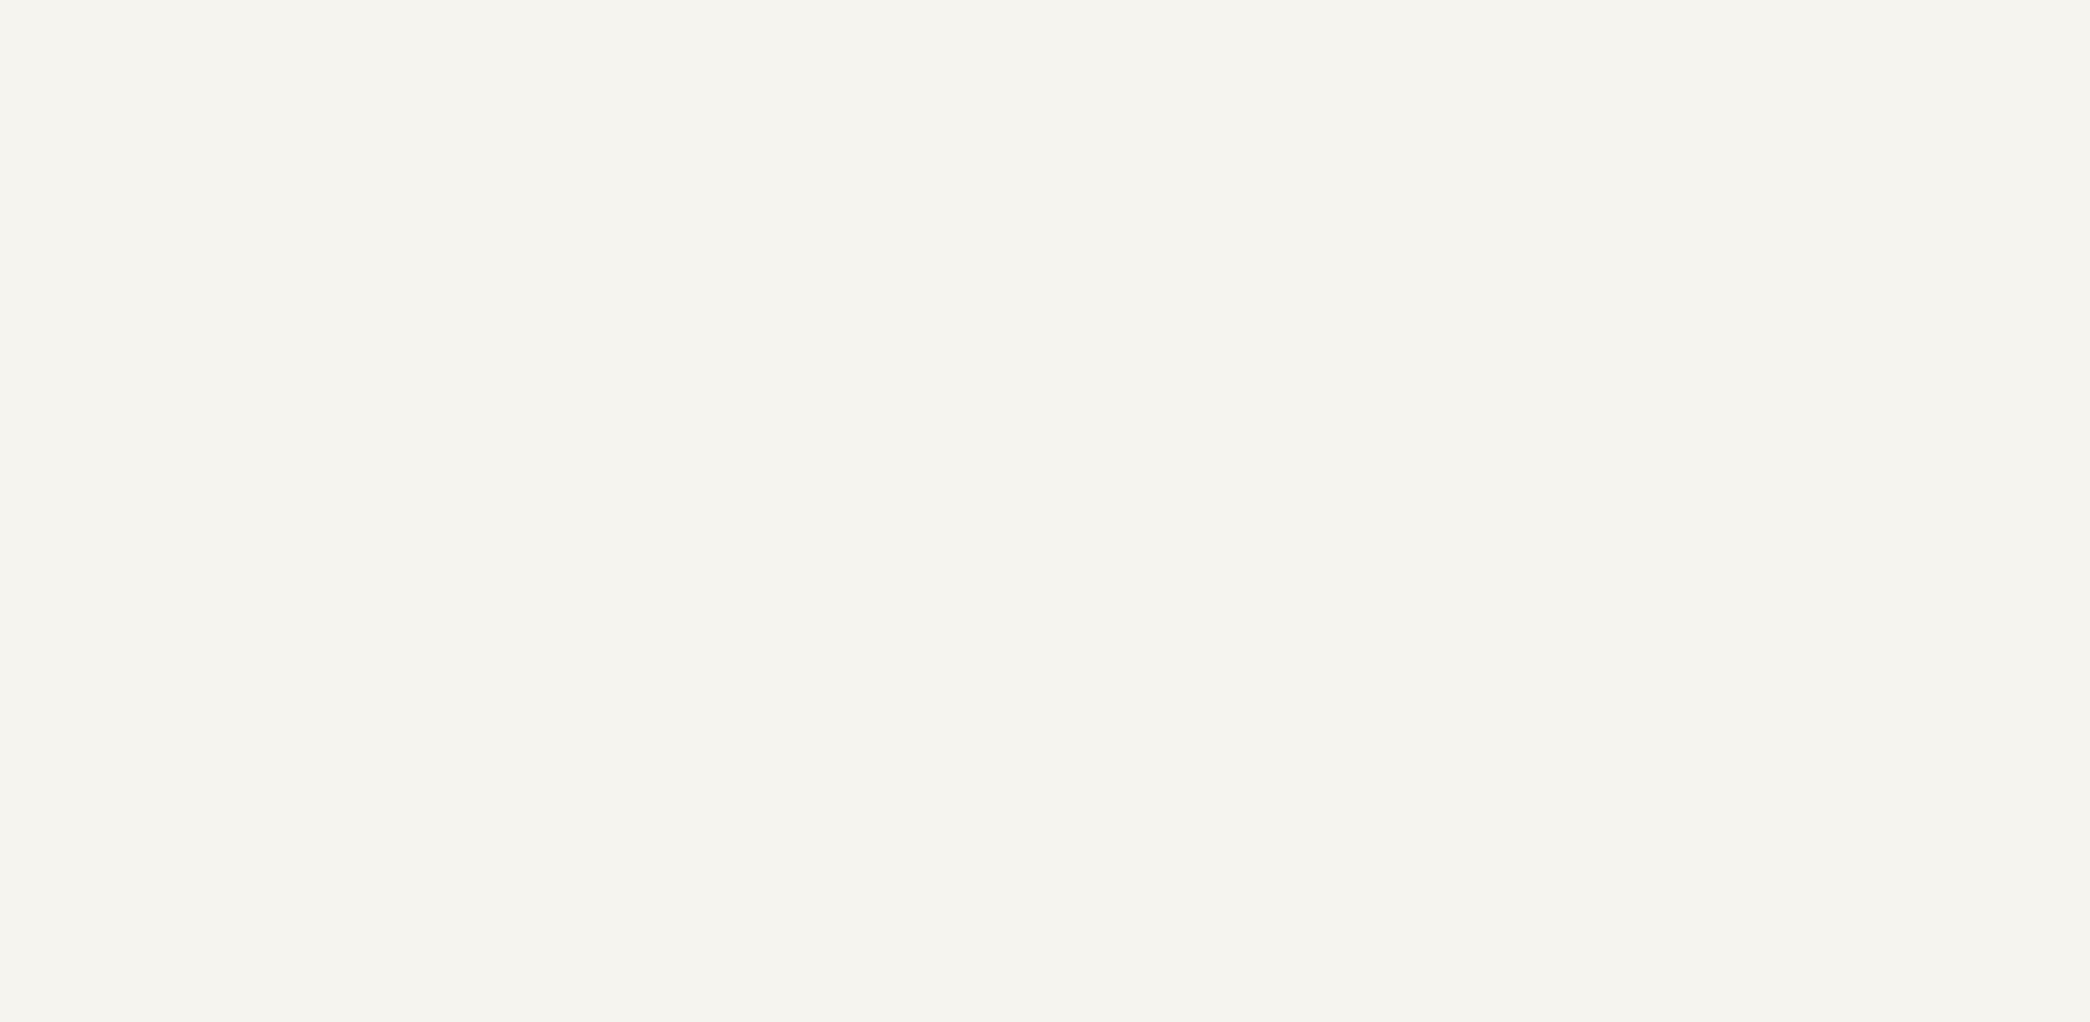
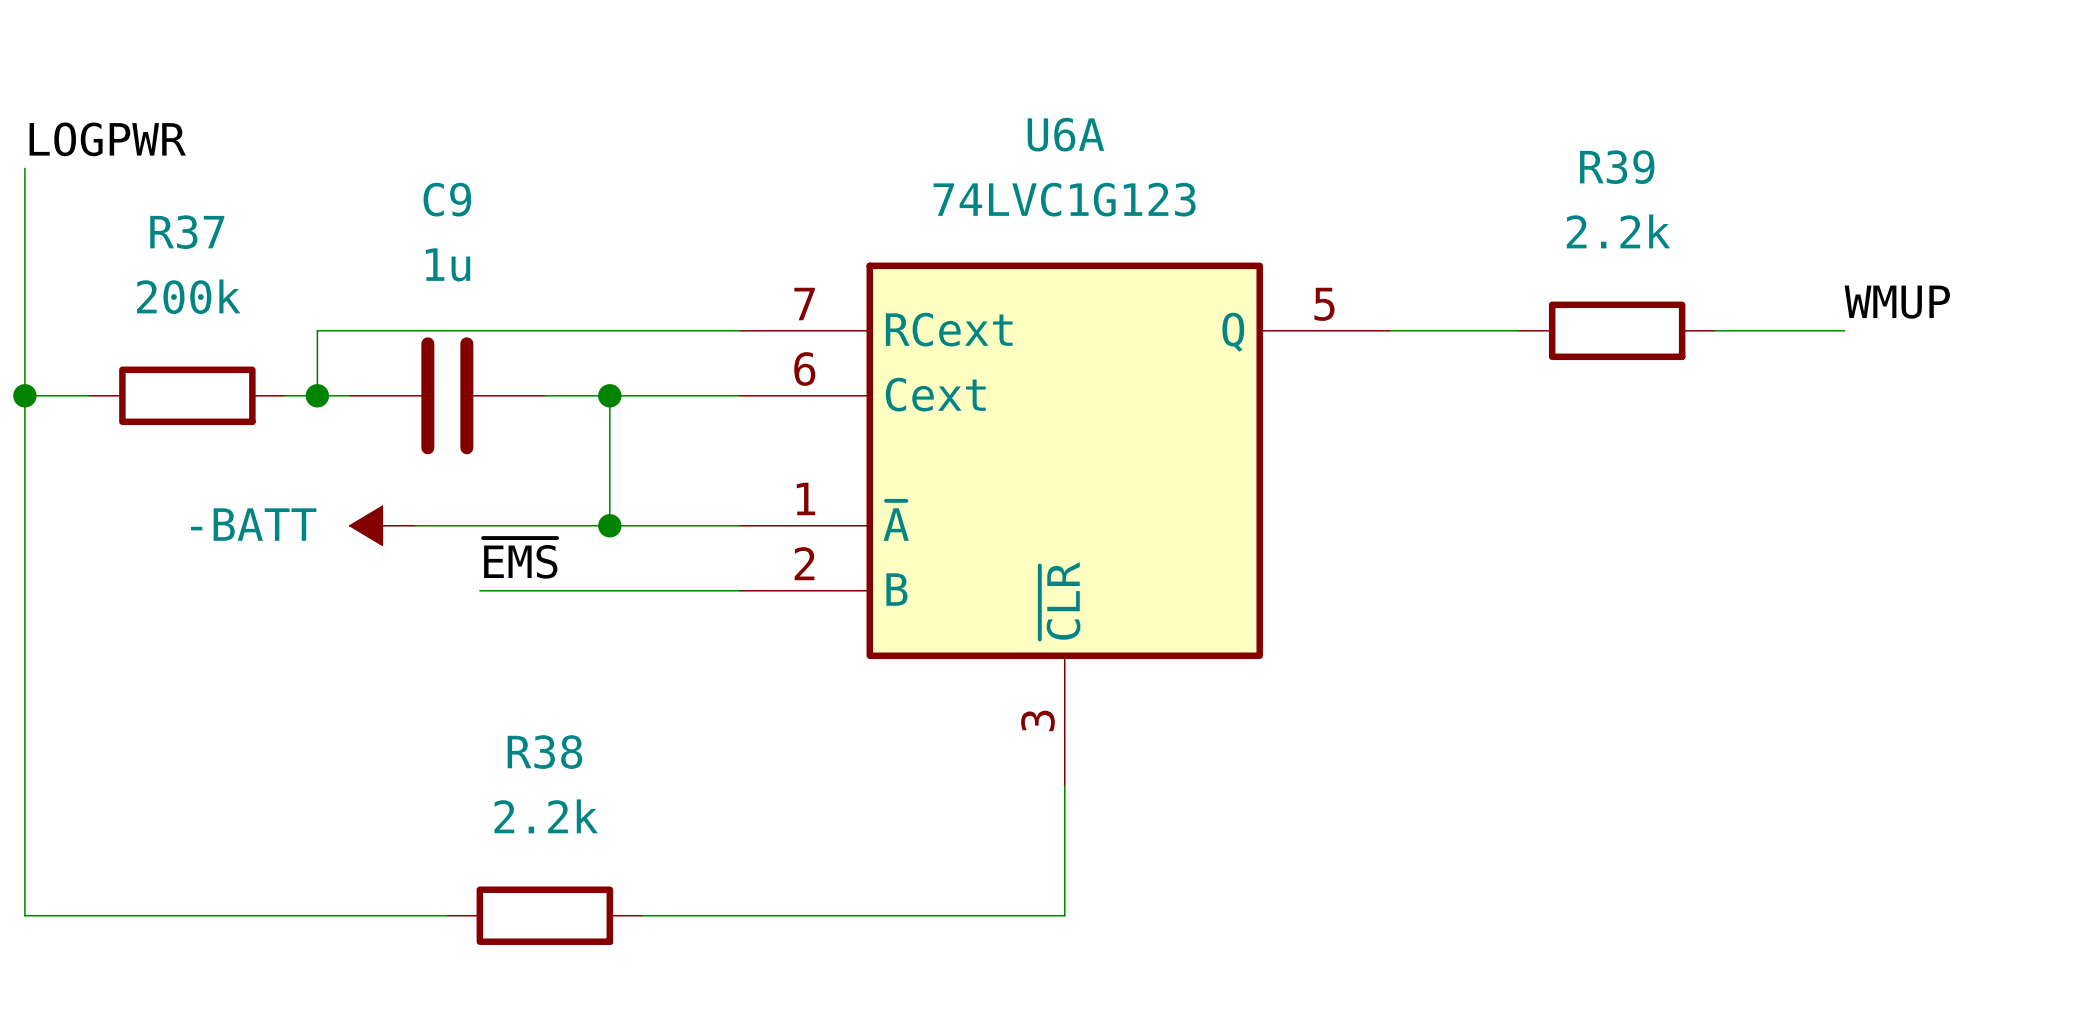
label: none -> LOGPWR (107, 139)
wire: none -> (24, 168) (24, 915) (447, 915)
label: none -> WMUP (1897, 302)
wire: none -> (739, 330) (317, 330) (317, 395)
wire: none -> (1389, 330) (1519, 330)
R39: none -> 2.2k (1617, 330)
wire: none -> (1714, 330) (1844, 330)
wire: none -> (24, 395) (89, 395)
junction: none -> (24, 395)
R37: none -> 200k (187, 395)
wire: none -> (284, 395) (349, 395)
junction: none -> (317, 395)
C9: none -> 1u (447, 395)
wire: none -> (544, 395) (739, 395)
wire: none -> (609, 395) (609, 525)
junction: none -> (609, 395)
U6A: none -> 74LVC1G123 (1064, 524)
power symbol: none -> -BATT (382, 525)
wire: none -> (414, 525) (739, 525)
junction: none -> (609, 525)
label: none -> ~{EMS} (520, 558)
wire: none -> (479, 590) (739, 590)
wire: none -> (1064, 785) (1064, 915) (642, 915)
R38: none -> 2.2k (544, 915)

